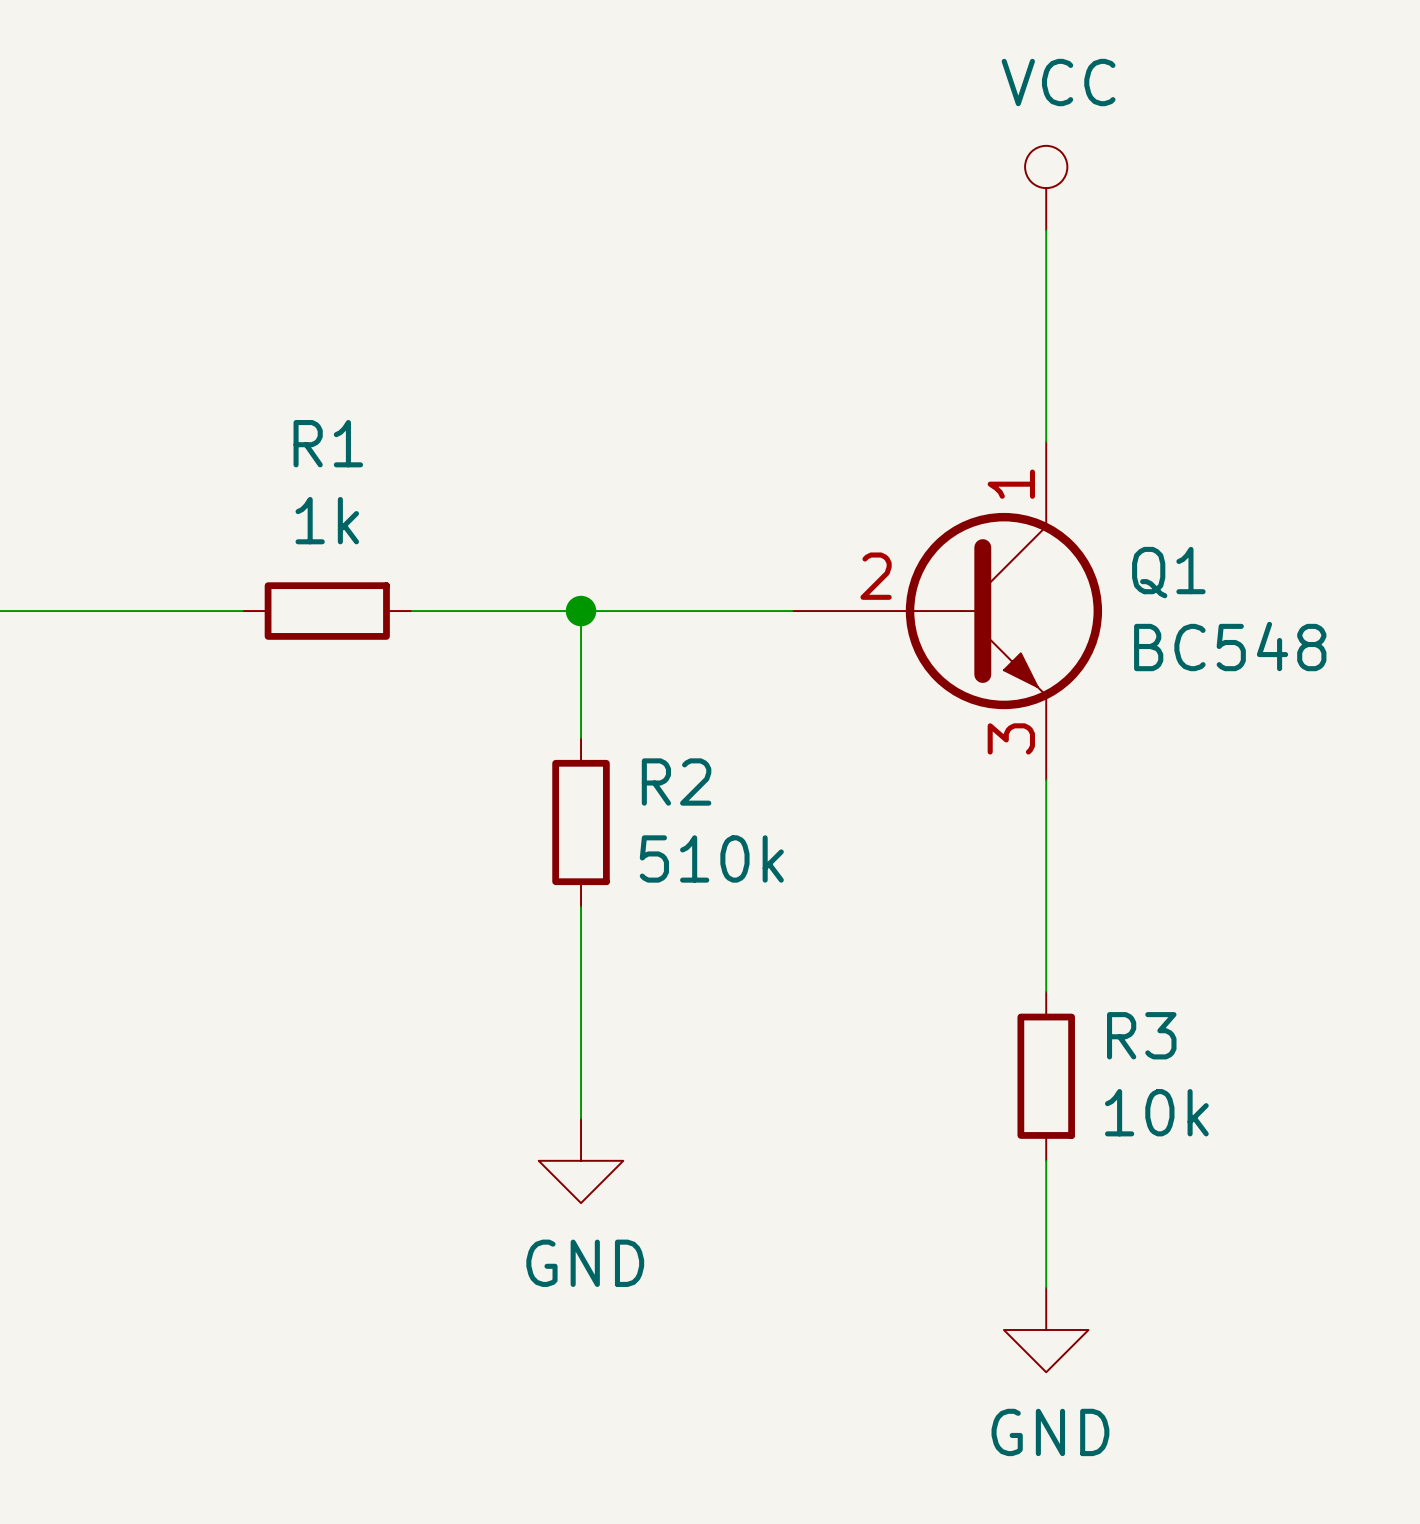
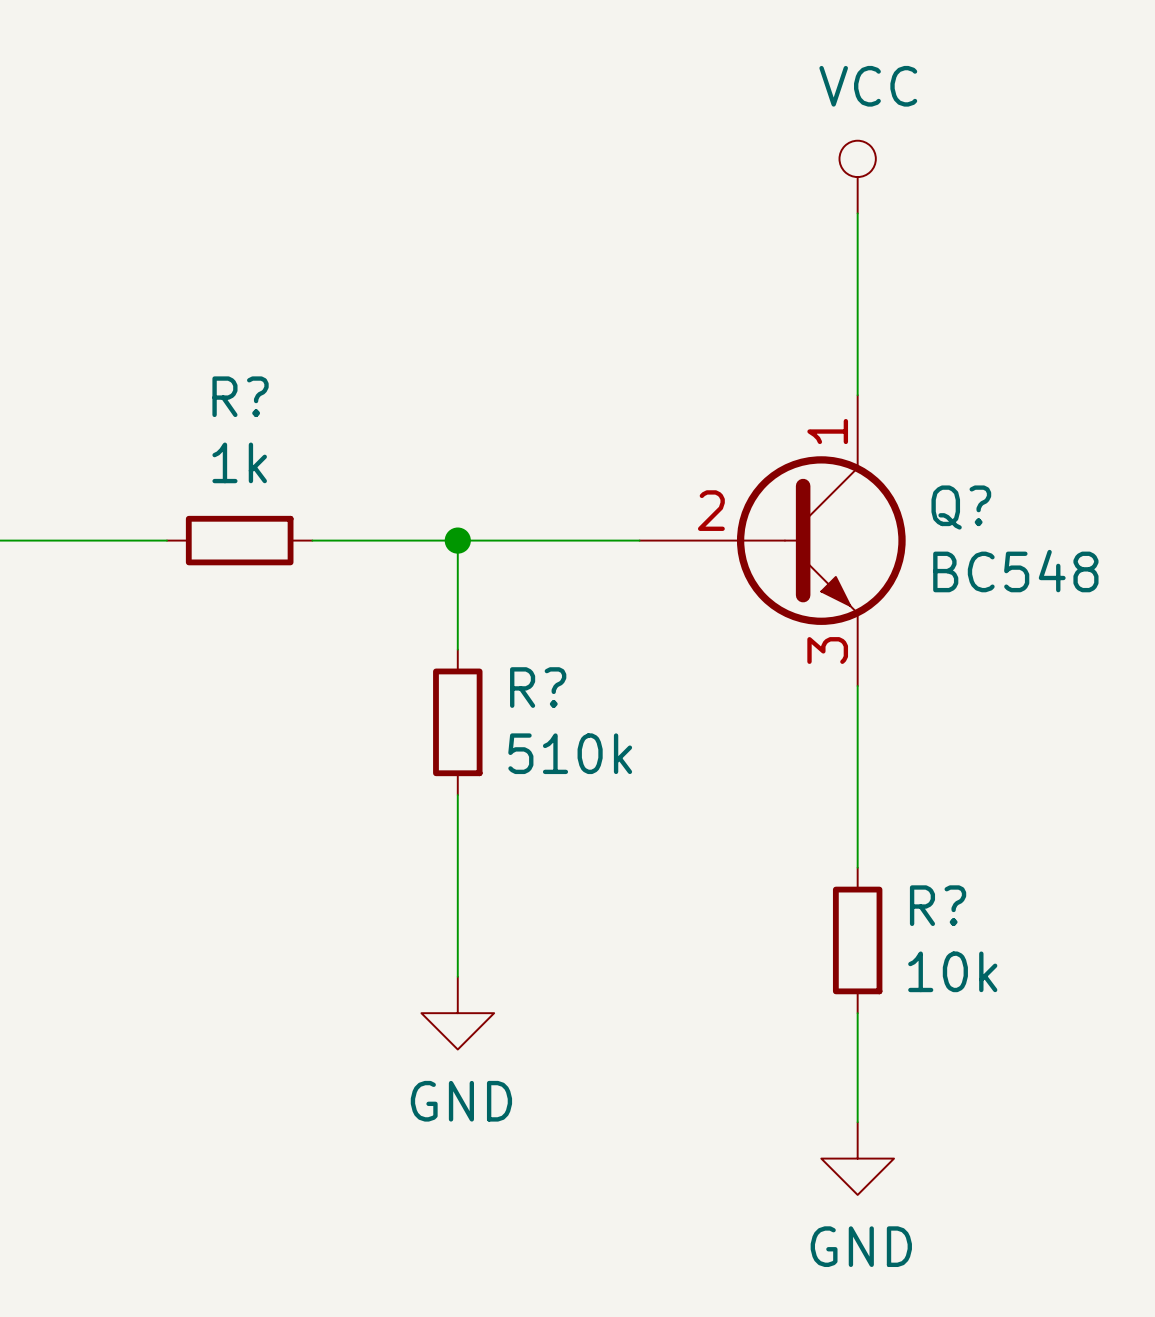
R1 name: R1 (328, 443) -> R? (240, 396)
Q1 name: Q1 (1168, 572) -> Q? (961, 507)
R2 name: R2 (676, 782) -> R? (538, 687)
R3 name: R3 (1141, 1035) -> R? (938, 905)

